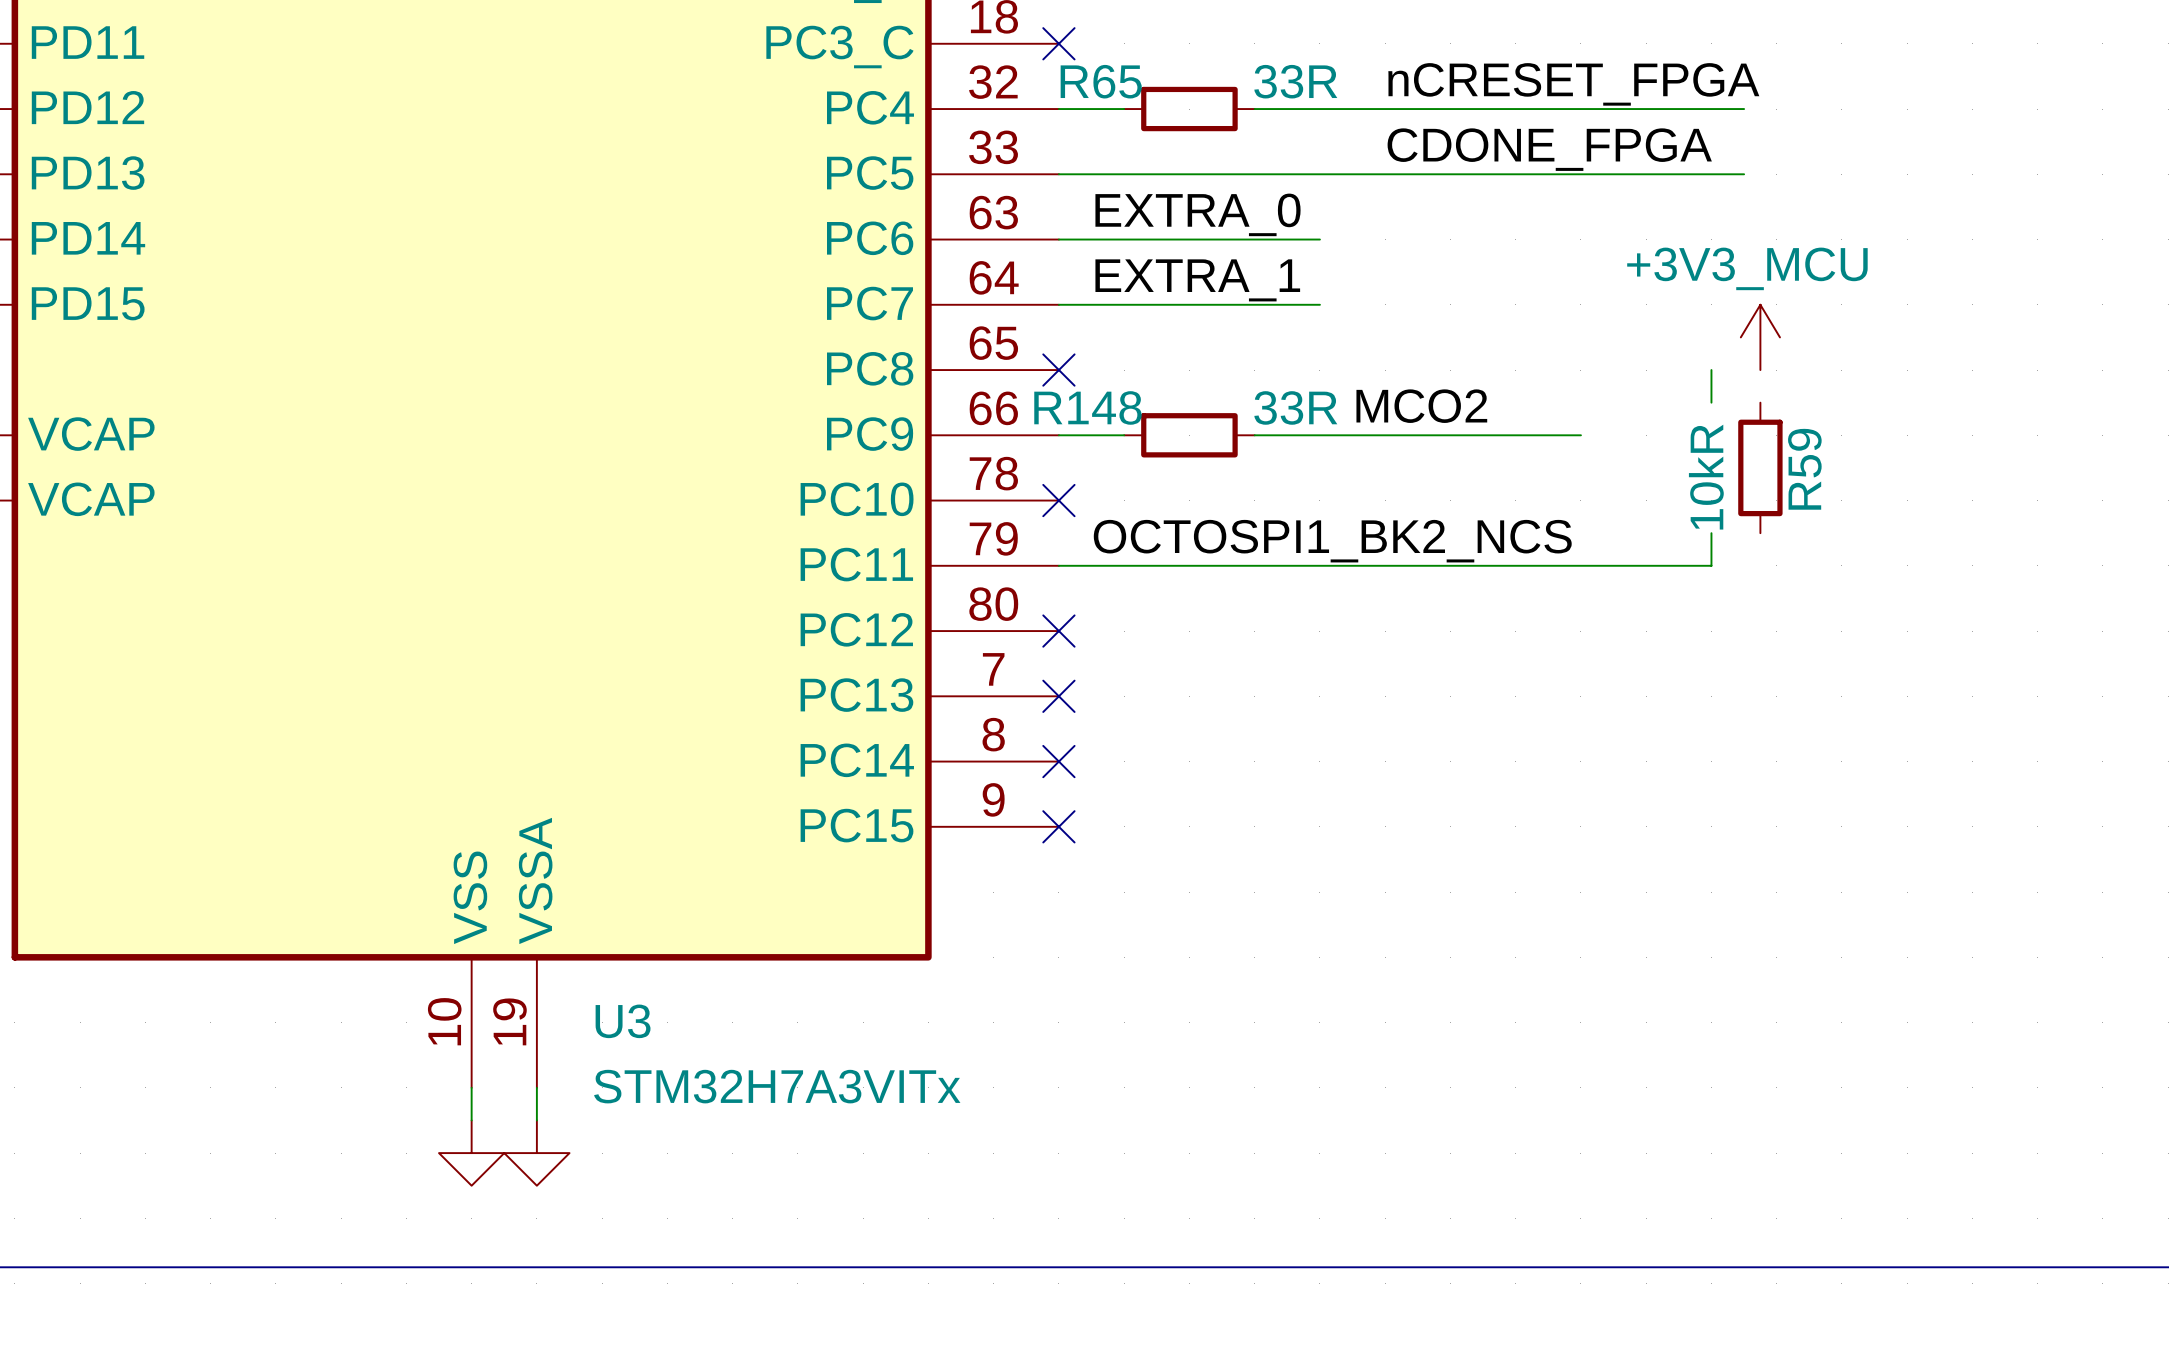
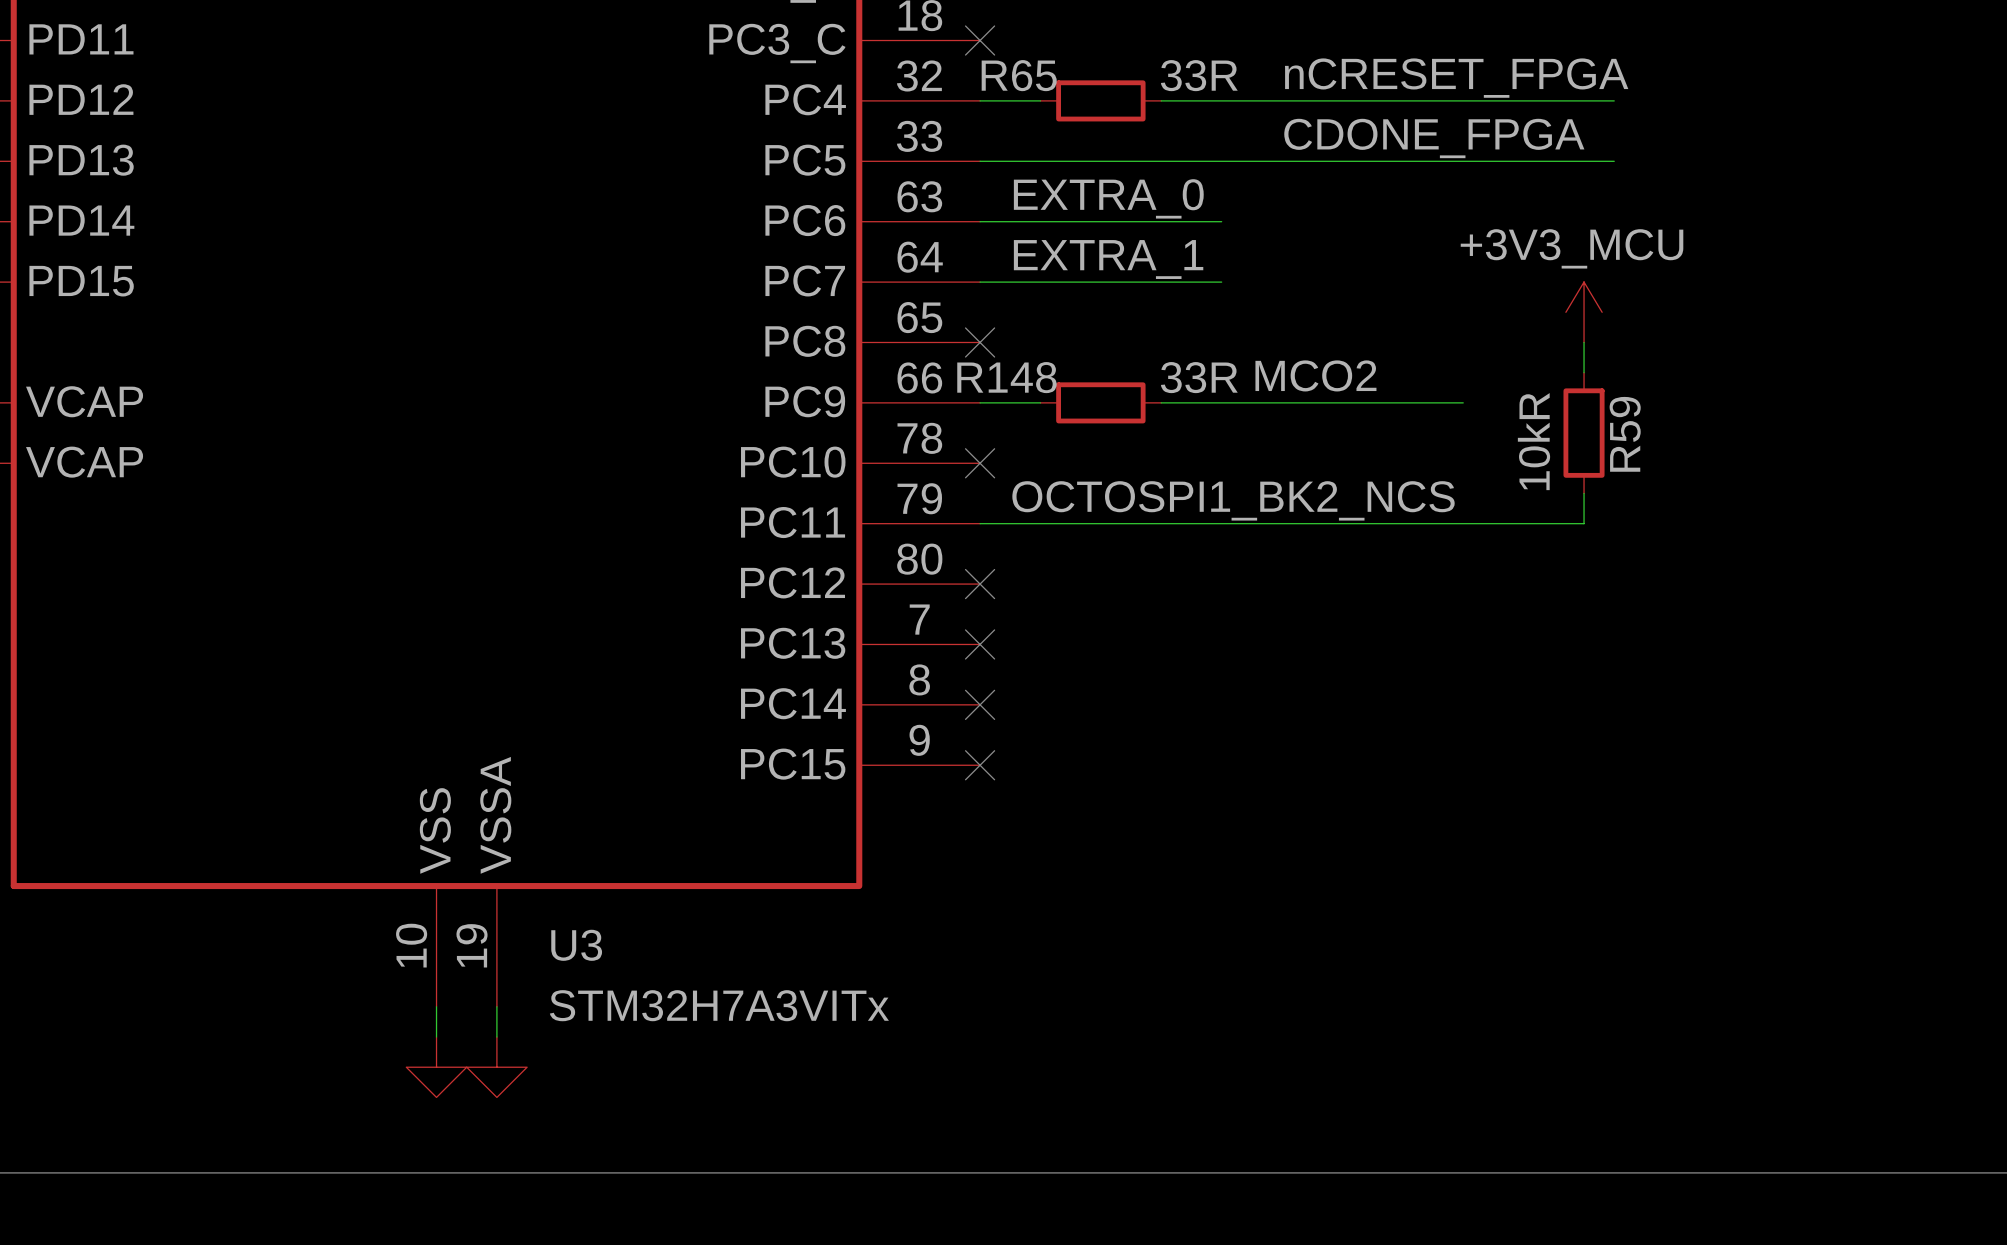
power symbol position: +3V3_MCU (1760, 337) -> +3V3_MCU (1584, 312)
R59 position: (1760, 467) -> (1584, 433)

